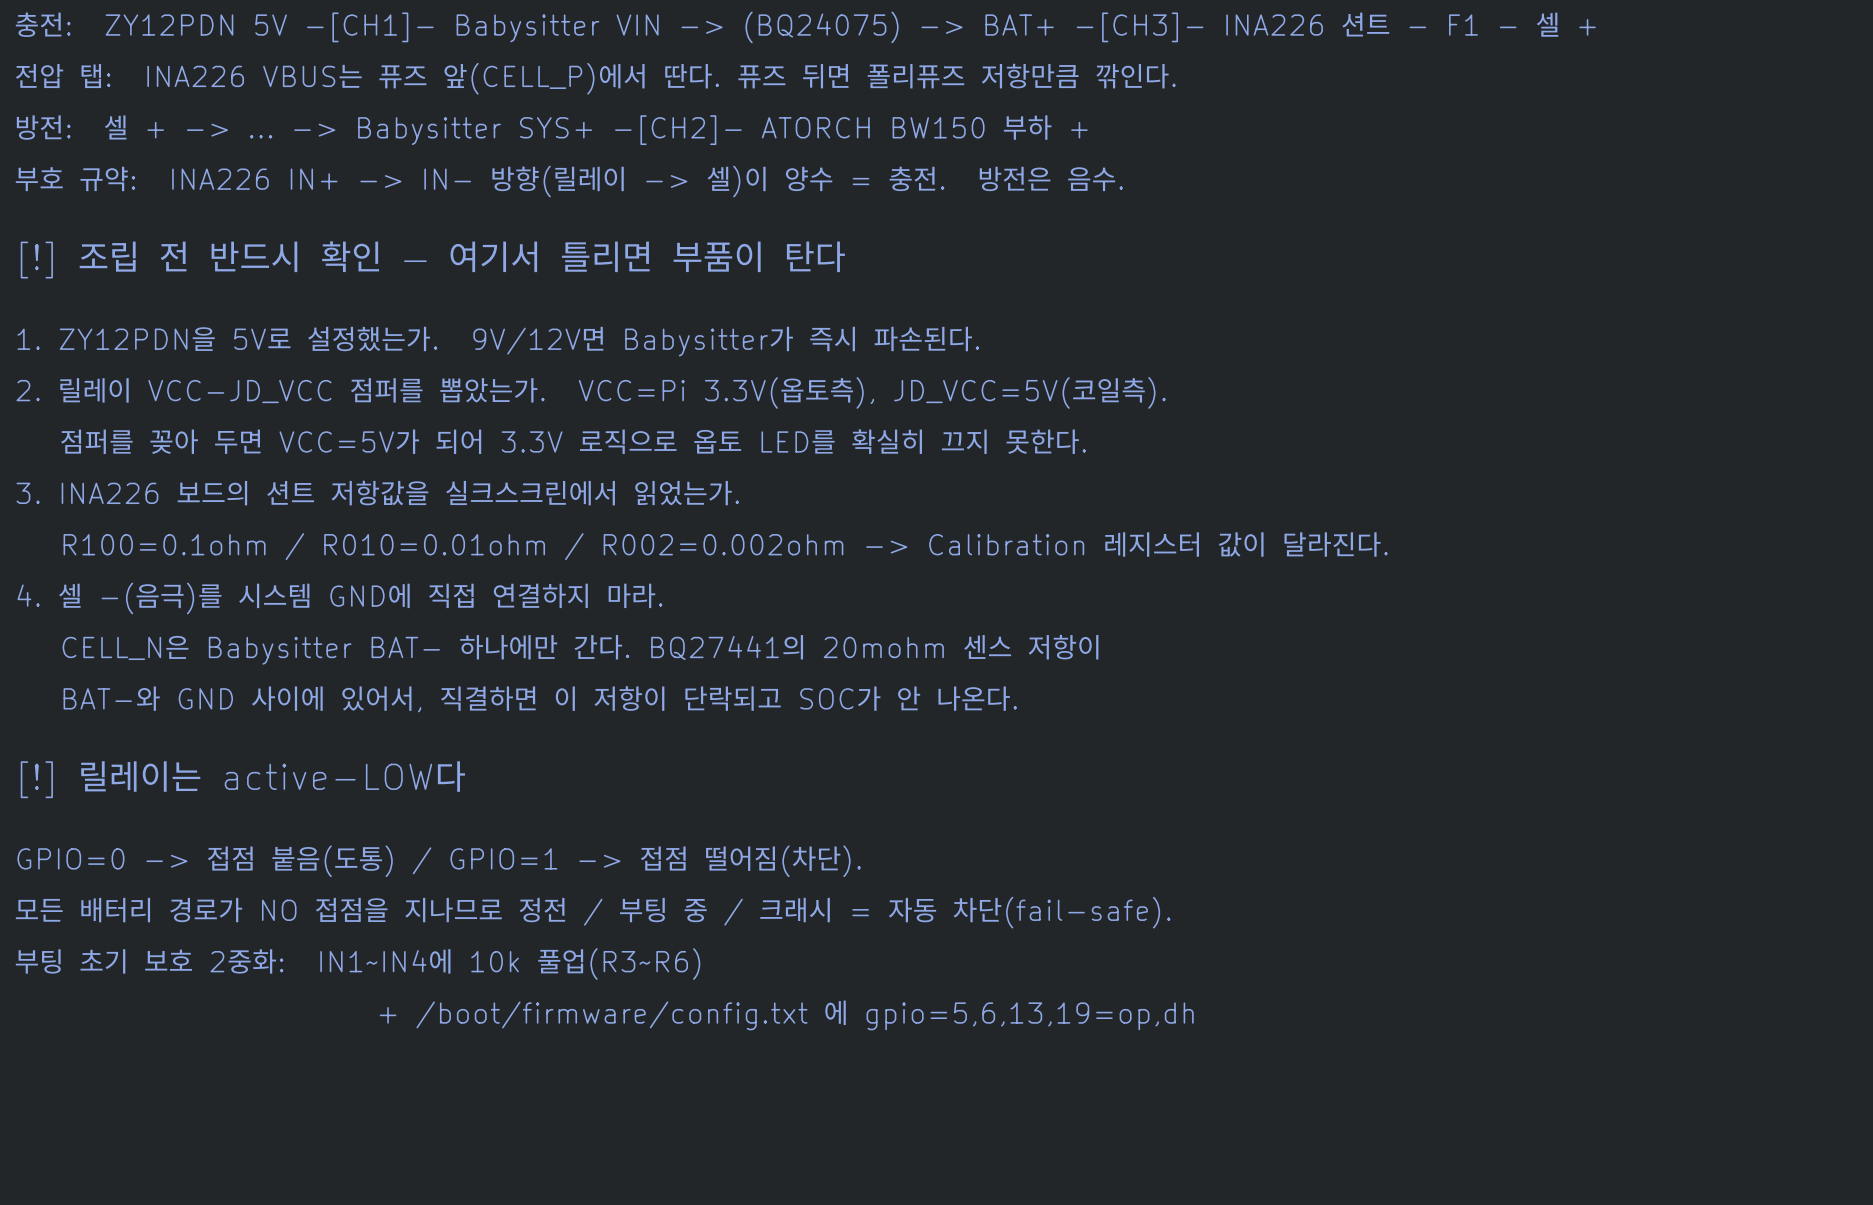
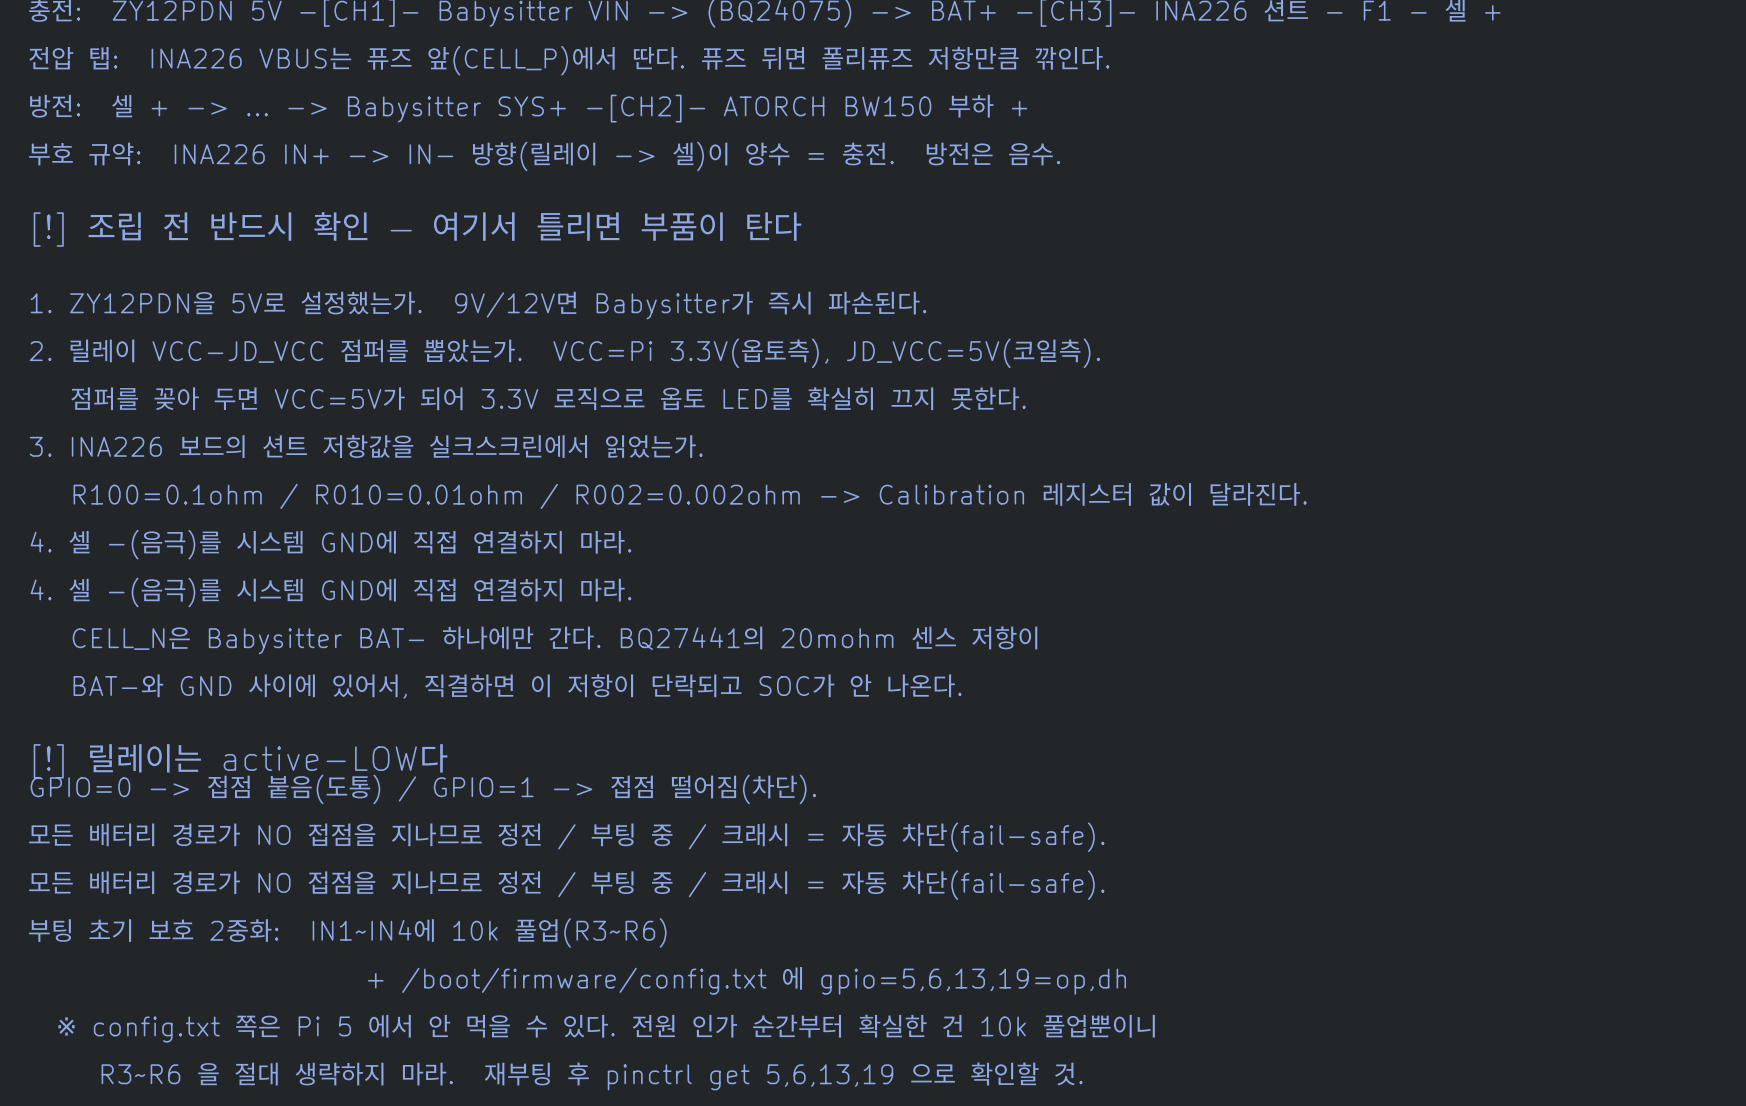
text: CELL_N은 Babysitter BAT- 하나에만 간다. BQ27441의 20mohm 센스 저항이 (580, 649) -> 4. 셀 -(음극)를 시스템 GND에 직접 연결하지 마라. (330, 592)
text: BAT-와 GND 사이에 있어서, 직결하면 이 저항이 단락되고 SOC가 안 나온다. (540, 698) -> CELL_N은 Babysitter BAT- 하나에만 간다. BQ27441의 20mohm 센스 저항이 (555, 639)
text: none -> BAT-와 GND 사이에 있어서, 직결하면 이 저항이 단락되고 SOC가 안 나온다. (517, 686)
text position: [!] 릴레이는 active-LOW다 (243, 779) -> [!] 릴레이는 active-LOW다 (240, 760)
text: 부팅 초기 보호 2중화: IN1~IN4에 10k 풀업(R3~R6) (357, 964) -> 모든 배터리 경로가 NO 접점을 지나므로 정전 / 부팅 중 / 크래시 = 자동 차단(fail-safe). (566, 885)
text: + /boot/firmware/config.txt 에 gpio=5,6,13,19=op,dh (786, 1015) -> 부팅 초기 보호 2중화: IN1~IN4에 10k 풀업(R3~R6) (347, 932)
text: none -> + /boot/firmware/config.txt 에 gpio=5,6,13,19=op,dh (747, 980)
text: none -> ※ config.txt 쪽은 Pi 5 에서 안 먹을 수 있다. 전원 인가 순간부터 확실한 건 10k 풀업뿐이니 (606, 1028)
text: none -> R3~R6 을 절대 생략하지 마라. 재부팅 후 pinctrl get 5,6,13,19 으로 확인할 것. (592, 1076)

